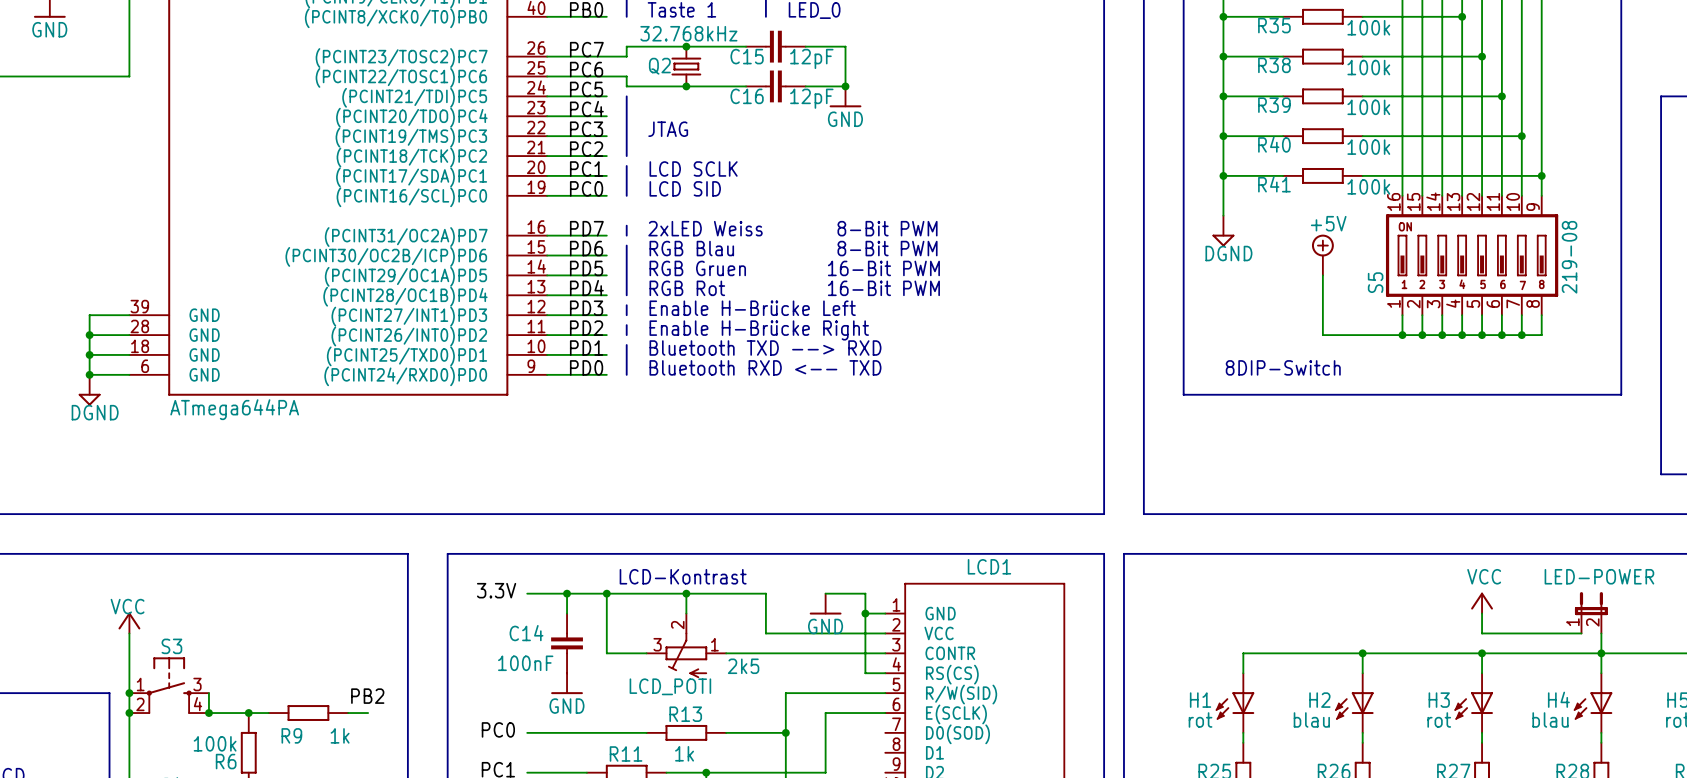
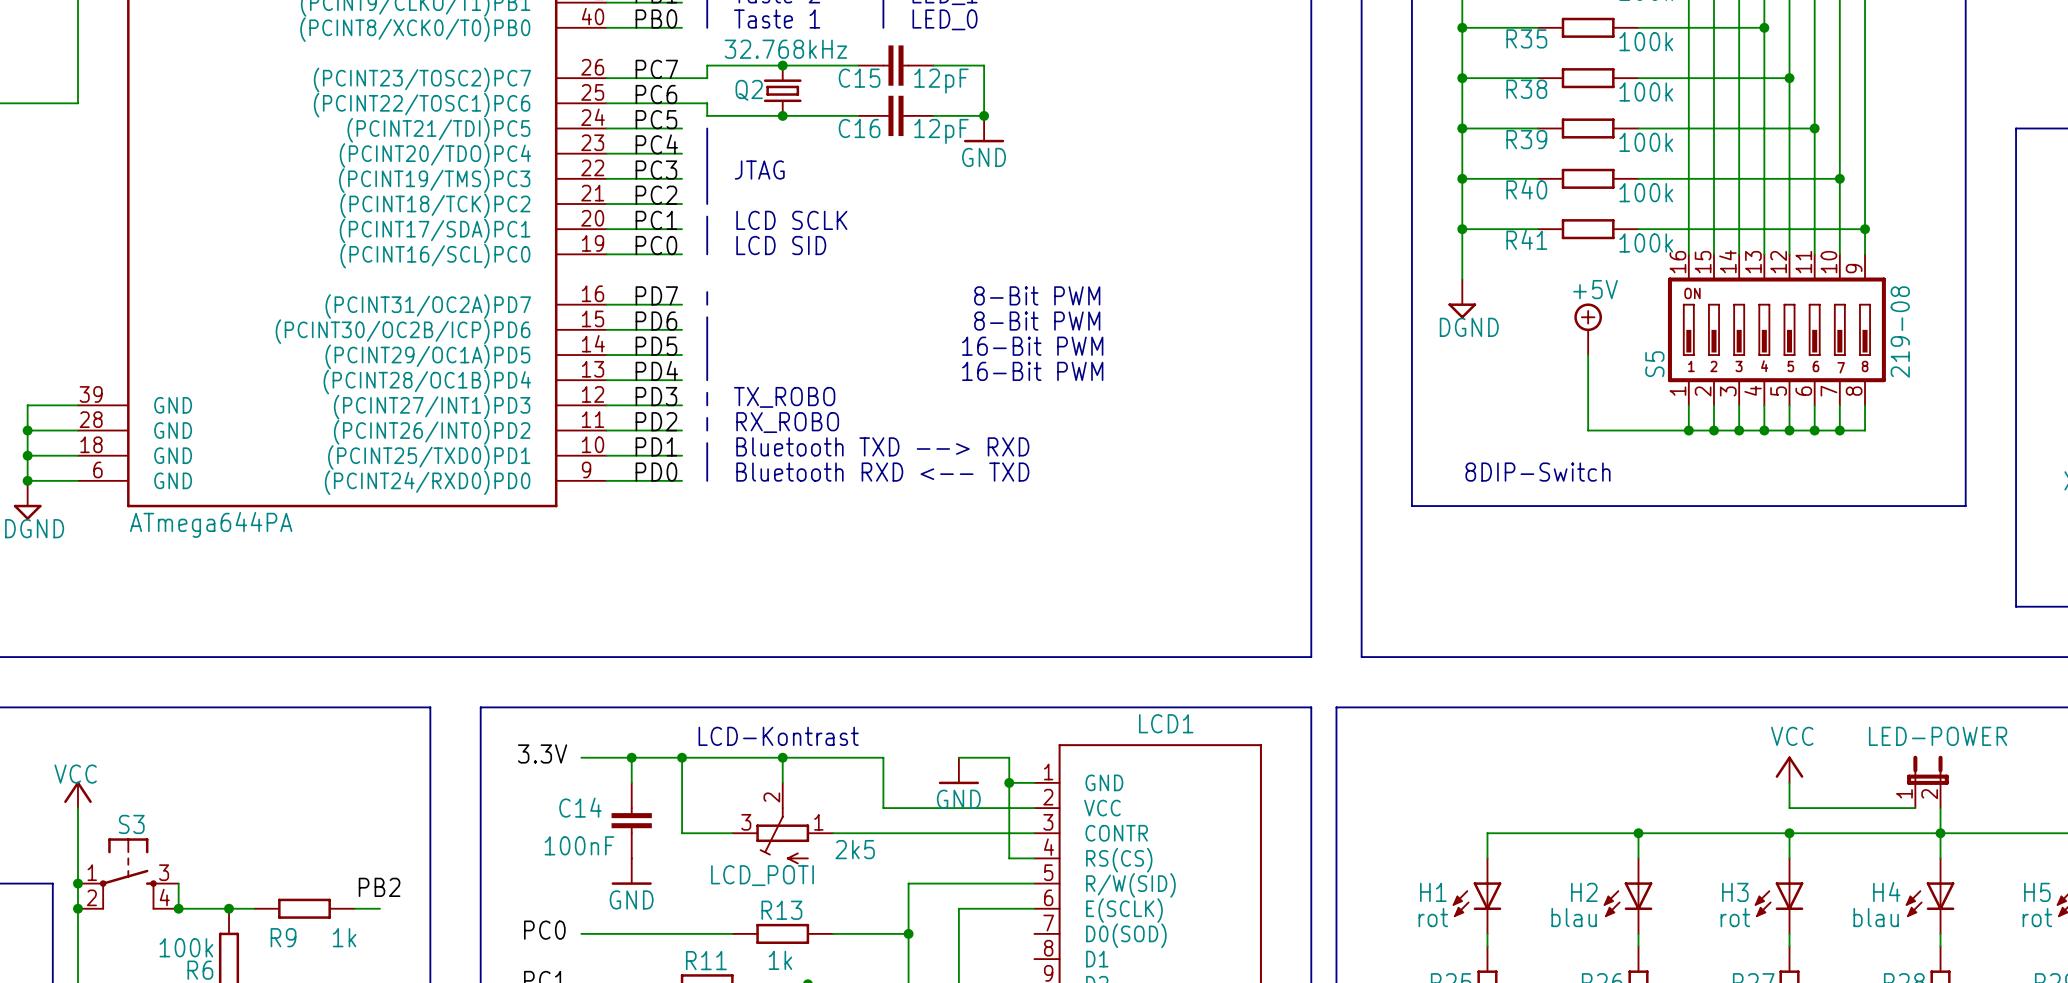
text: 2xLED Weiss (705, 228) -> none
text: RGB Blau (691, 248) -> none
text: RGB Gruen (697, 268) -> none
text: RGB Rot (687, 288) -> none
text: Enable H-Brücke Left (752, 308) -> TX_ROBO (784, 397)
text: Enable H-Brücke Right (759, 330) -> RX_ROBO (787, 422)

